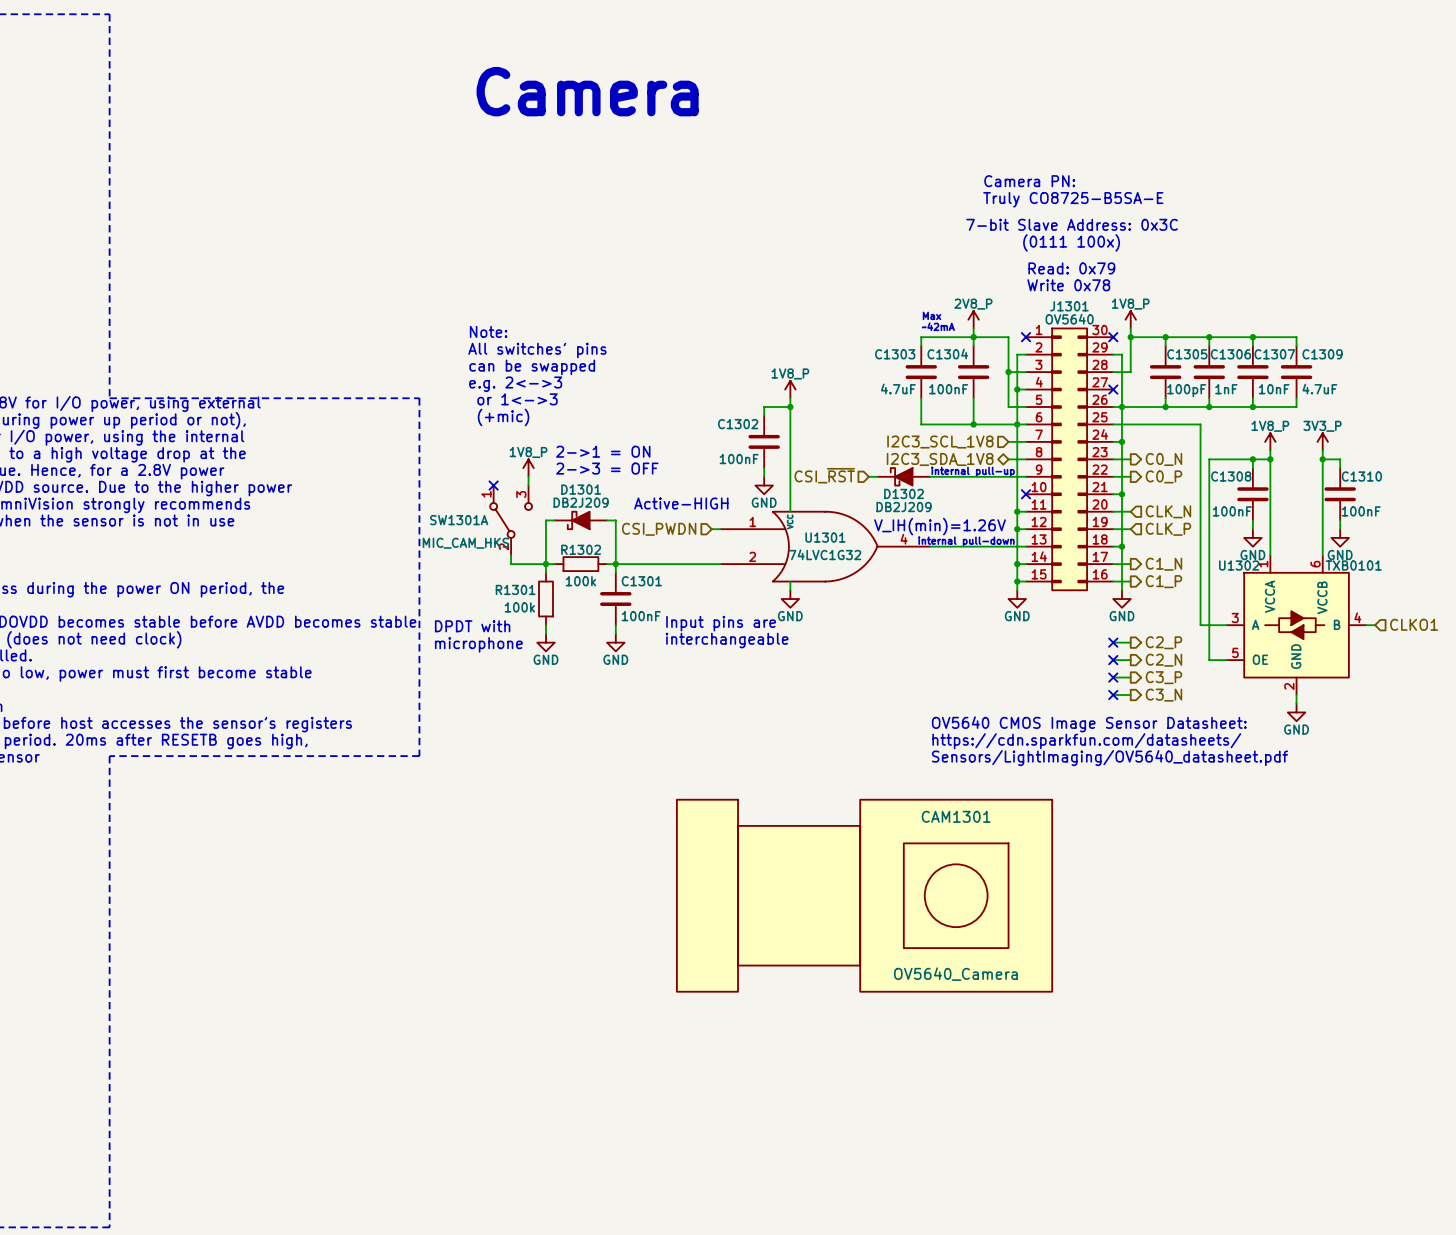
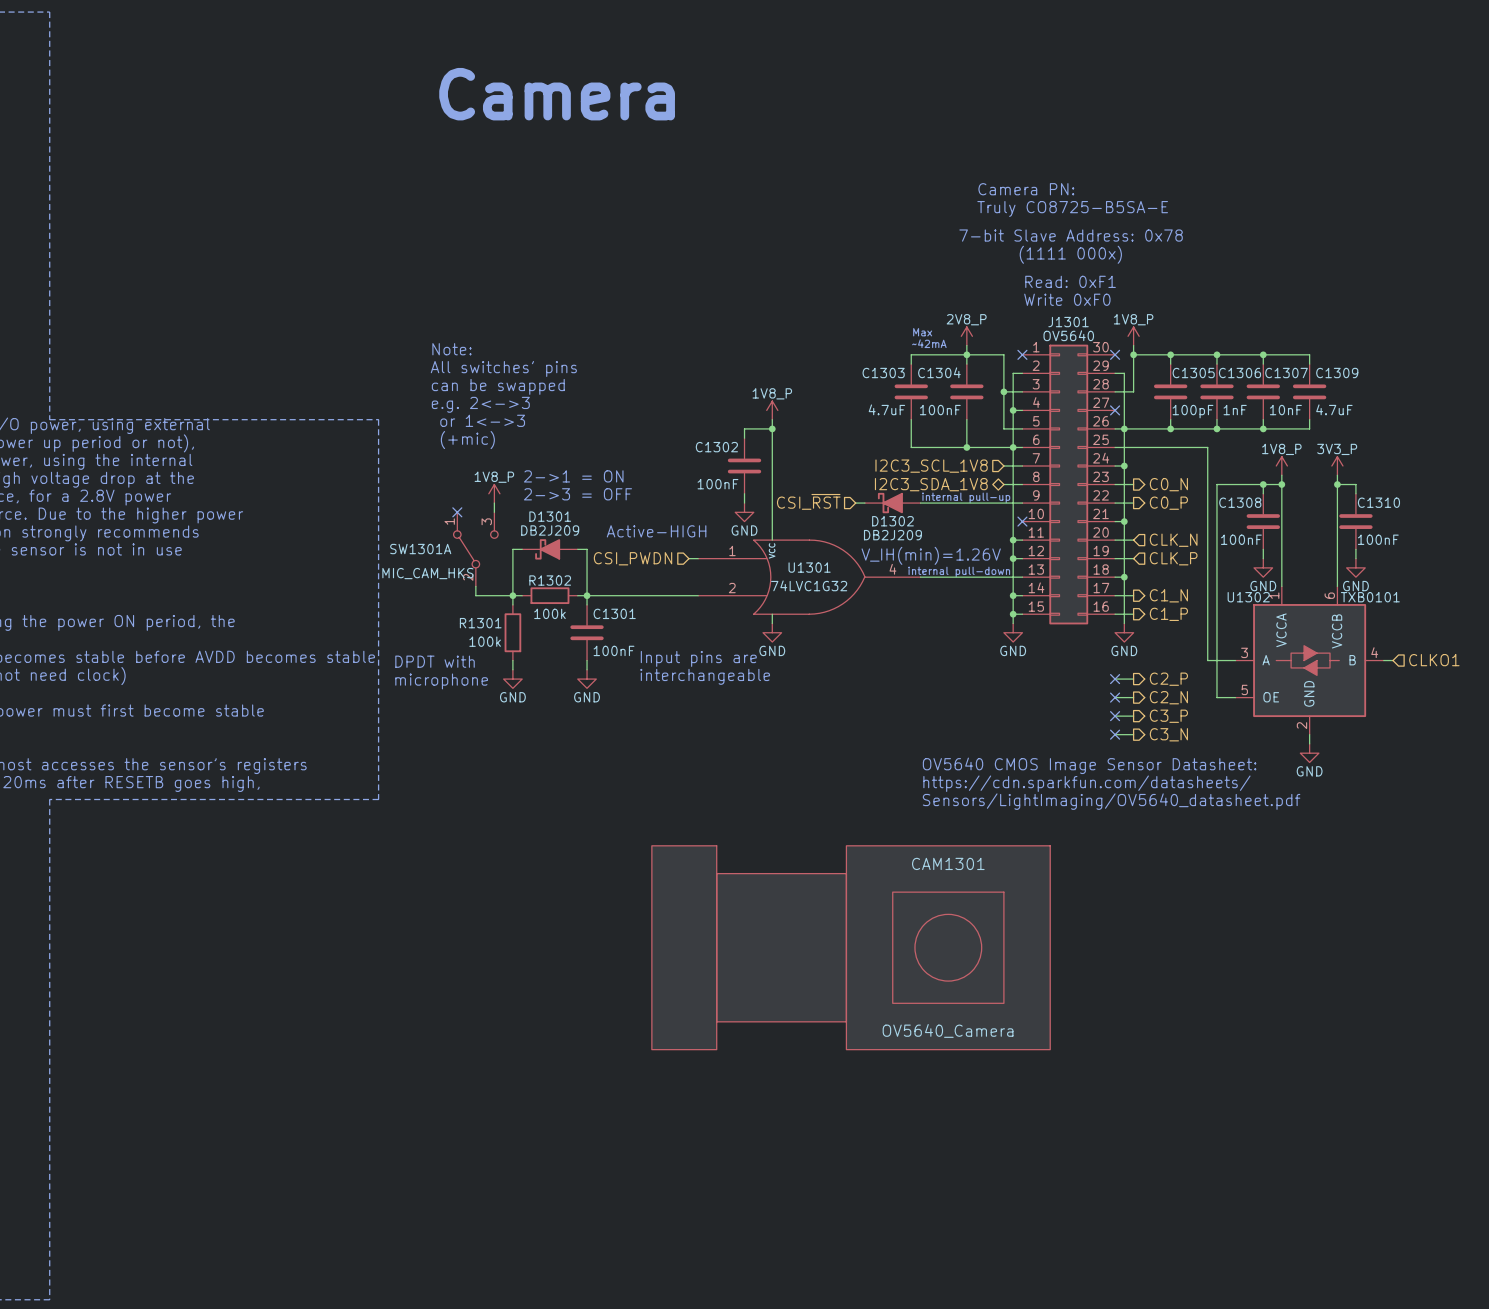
text: 7-bit Slave Address: 0x3C (1072, 224) -> 7-bit Slave Address: 0x78 (1071, 235)
text: (0111 100x) (1071, 242) -> (1111 000x) (1070, 254)
text: Read: 0x79 (1071, 268) -> Read: 0xF1 (1070, 281)
text: Write 0x78 (1068, 285) -> Write 0xF0 (1067, 299)

